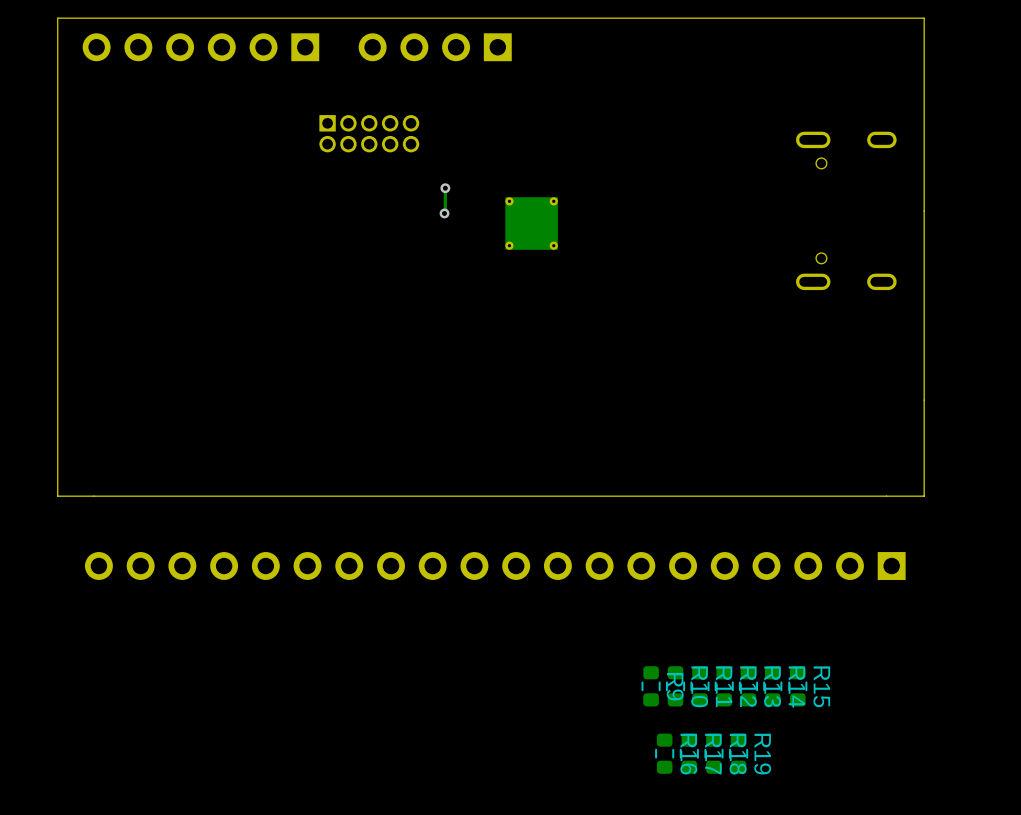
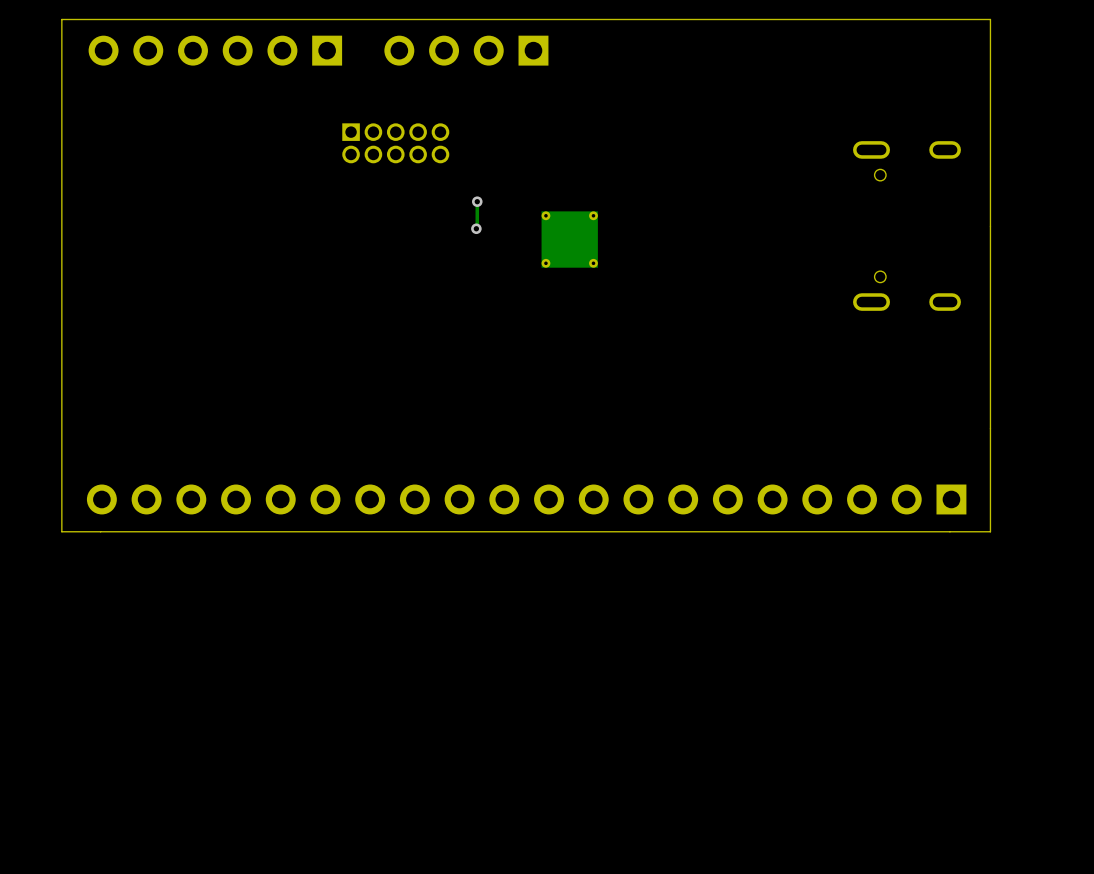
part position: (495, 566) -> (526, 499)
R9: (651, 686) -> none
R10: (675, 686) -> none
R11: (699, 686) -> none
R12: (724, 686) -> none
R13: (748, 686) -> none
R14: (772, 686) -> none
R15: (797, 686) -> none
R16: (664, 753) -> none
R17: (689, 753) -> none
R18: (713, 753) -> none
R19: (738, 753) -> none

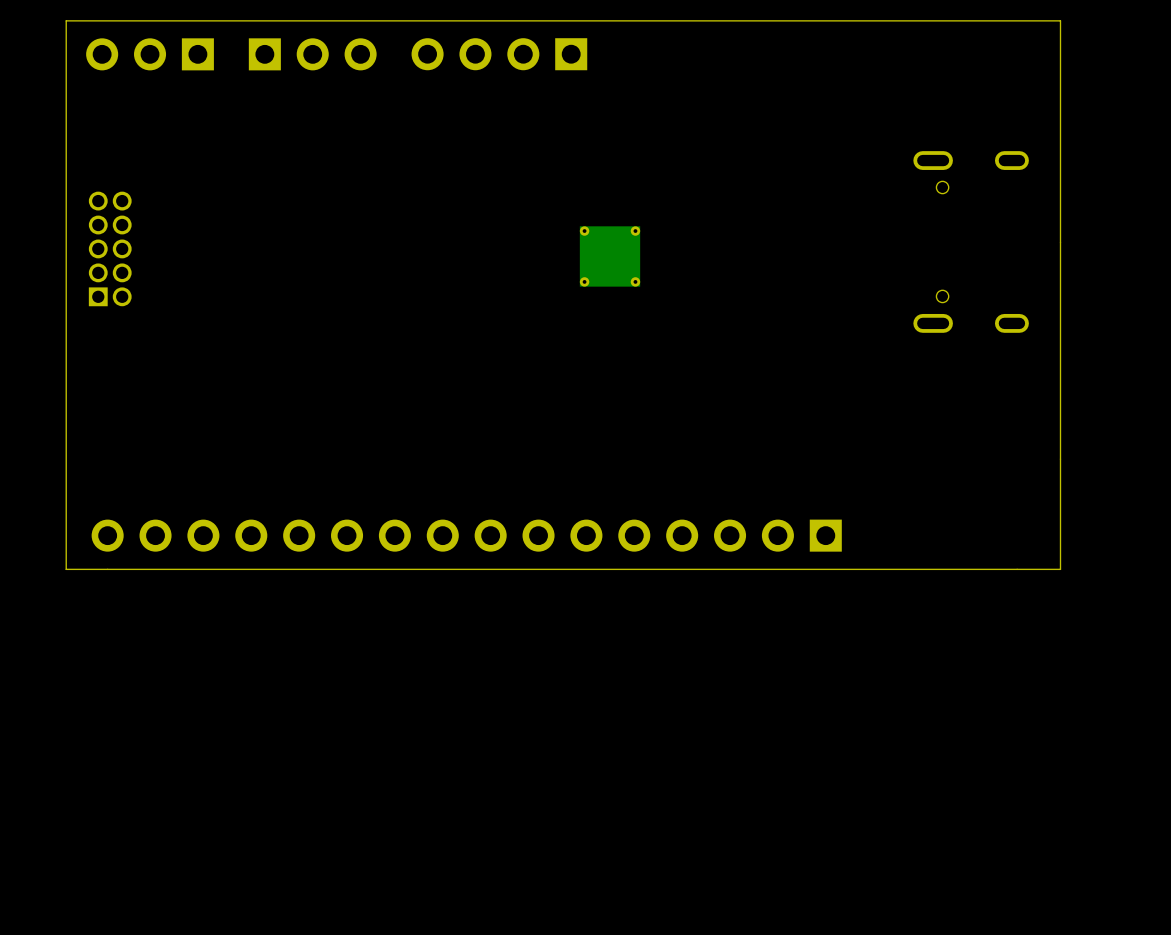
part: none -> (150, 54)
part: (215, 50) -> none
part: none -> (312, 54)
part rotation: 0° (395, 143) -> 90° counterclockwise (110, 248)
part position: (395, 143) -> (110, 248)
track: (477, 201) (476, 228) -> none
via: (477, 201) -> none
via: (476, 228) -> none
part: (526, 499) -> none
part: none -> (466, 535)

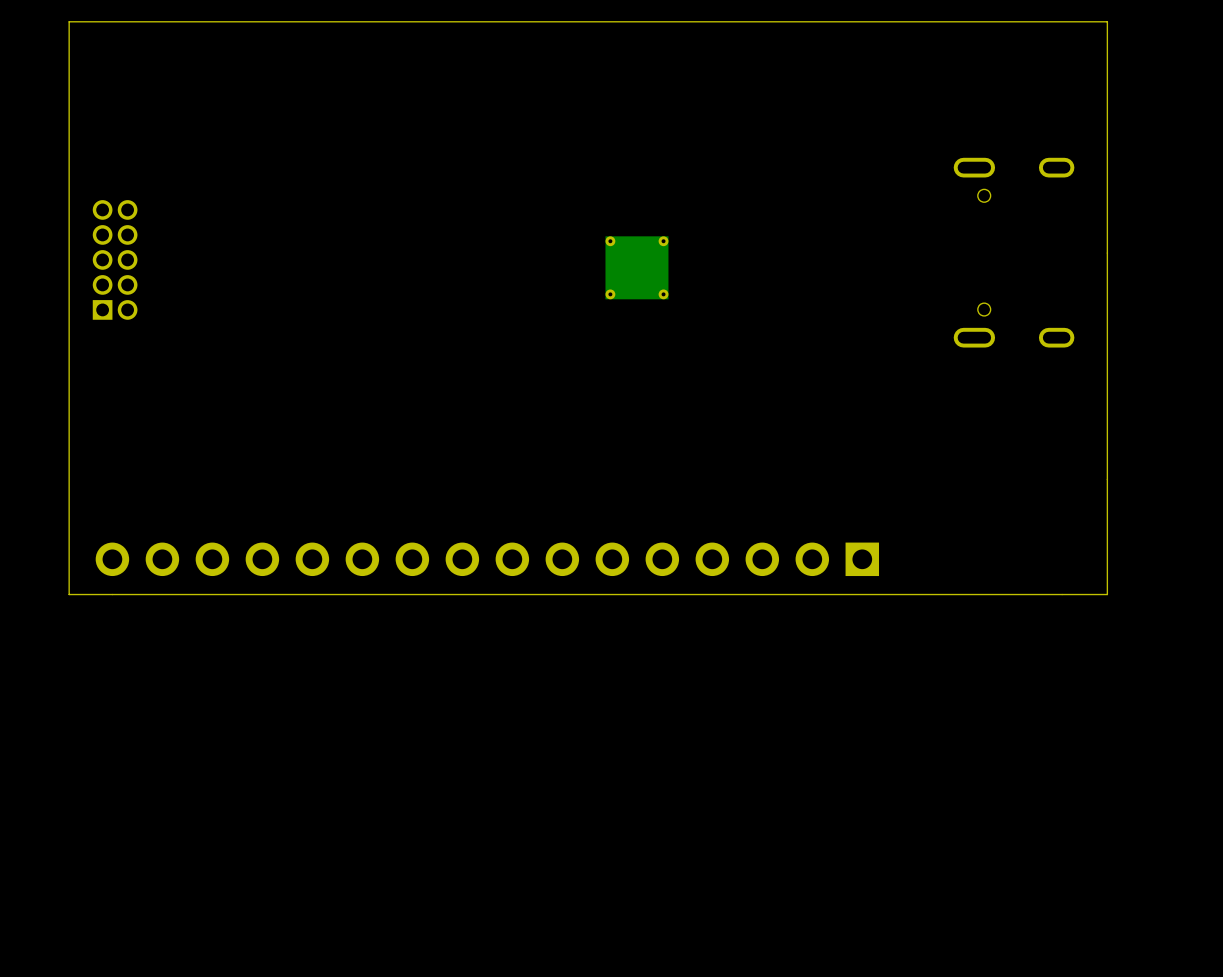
part: (150, 54) -> none
part: (312, 54) -> none
part: (499, 54) -> none

